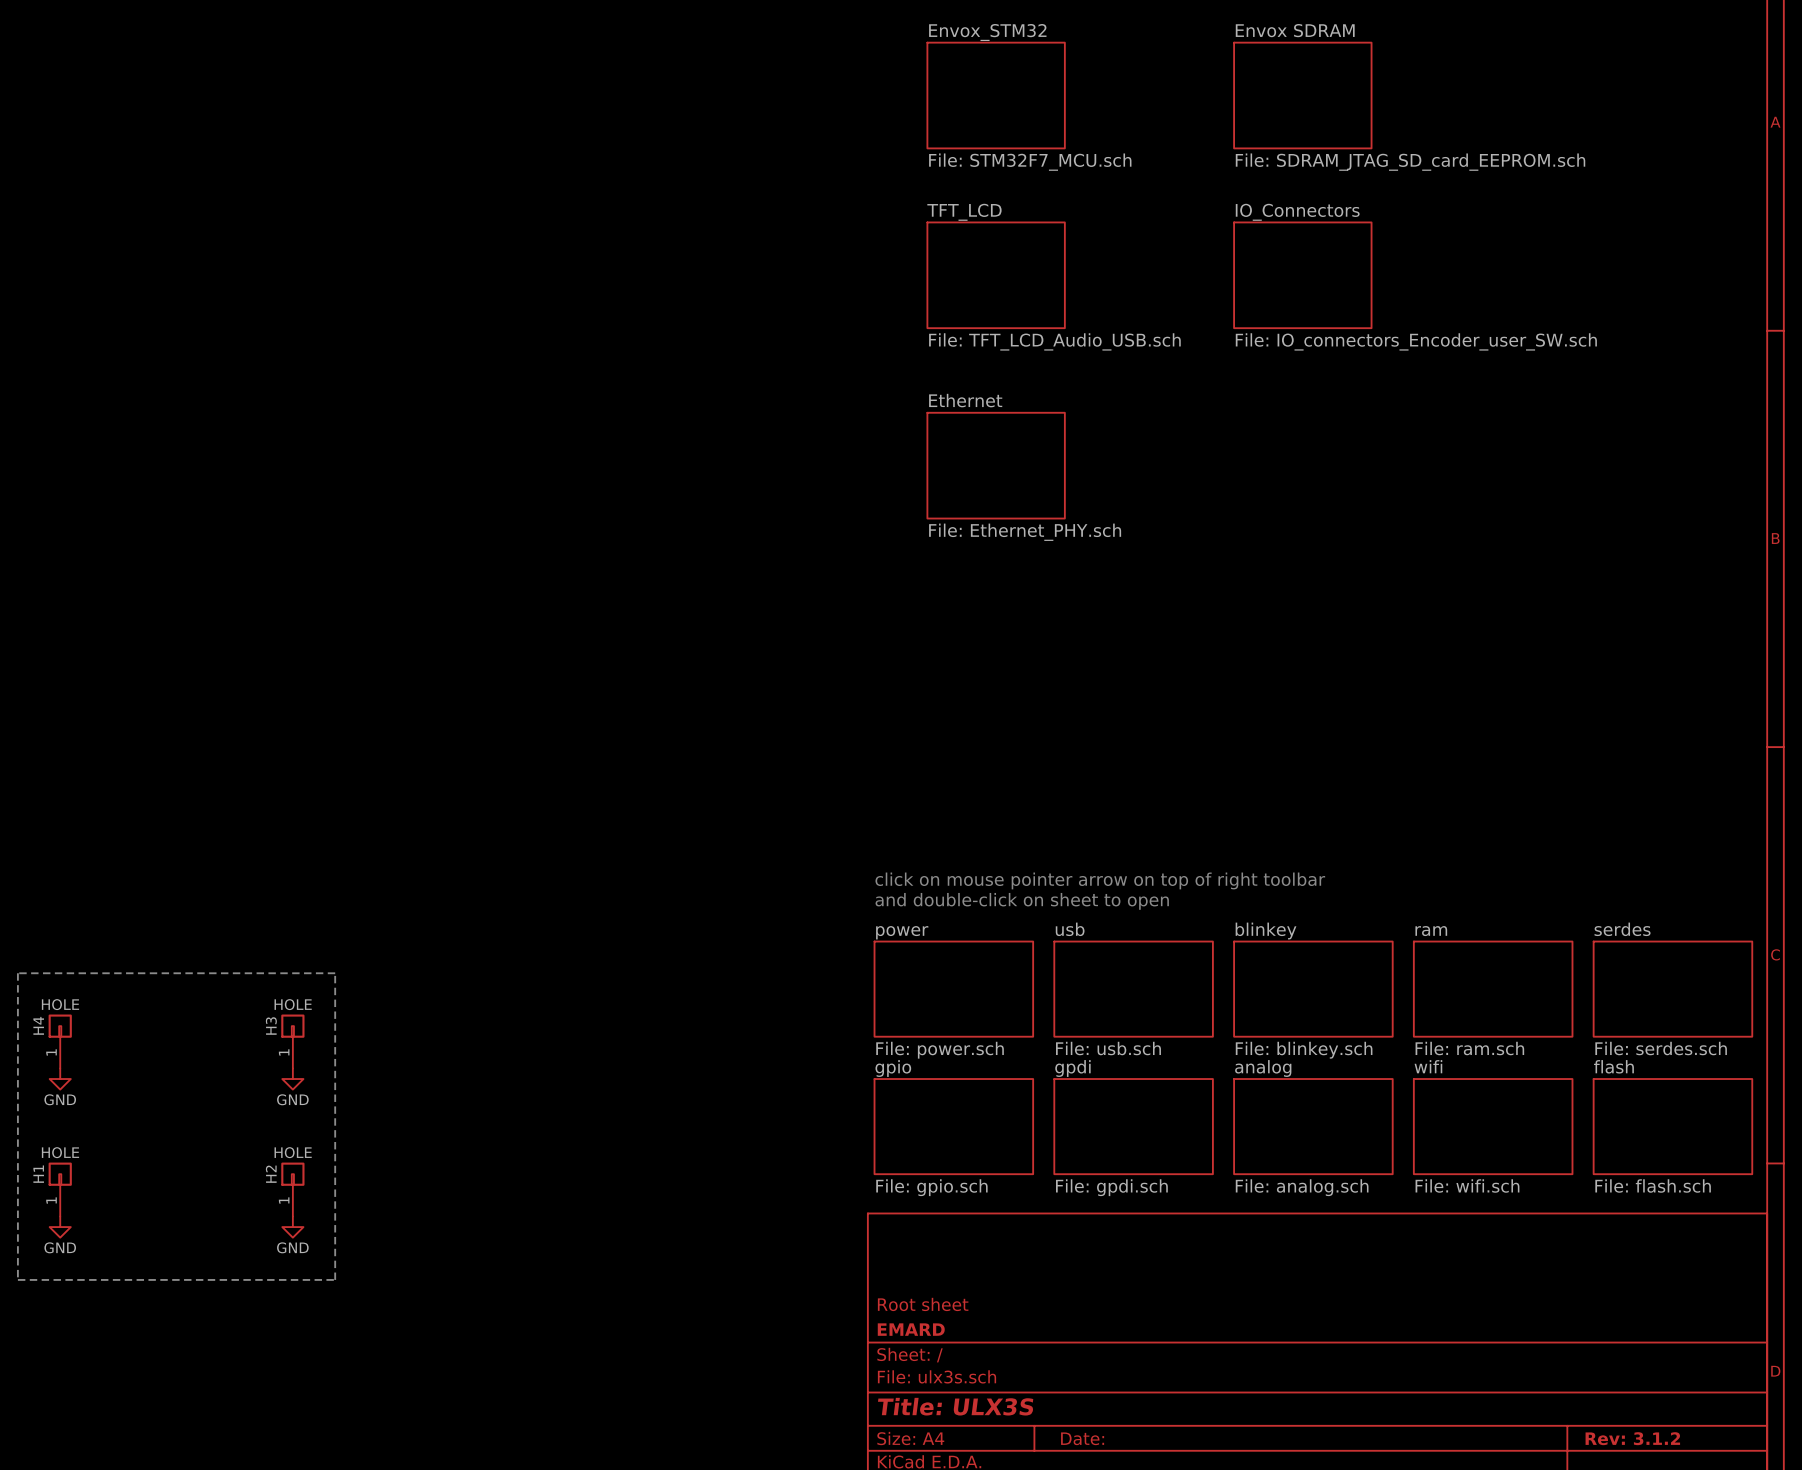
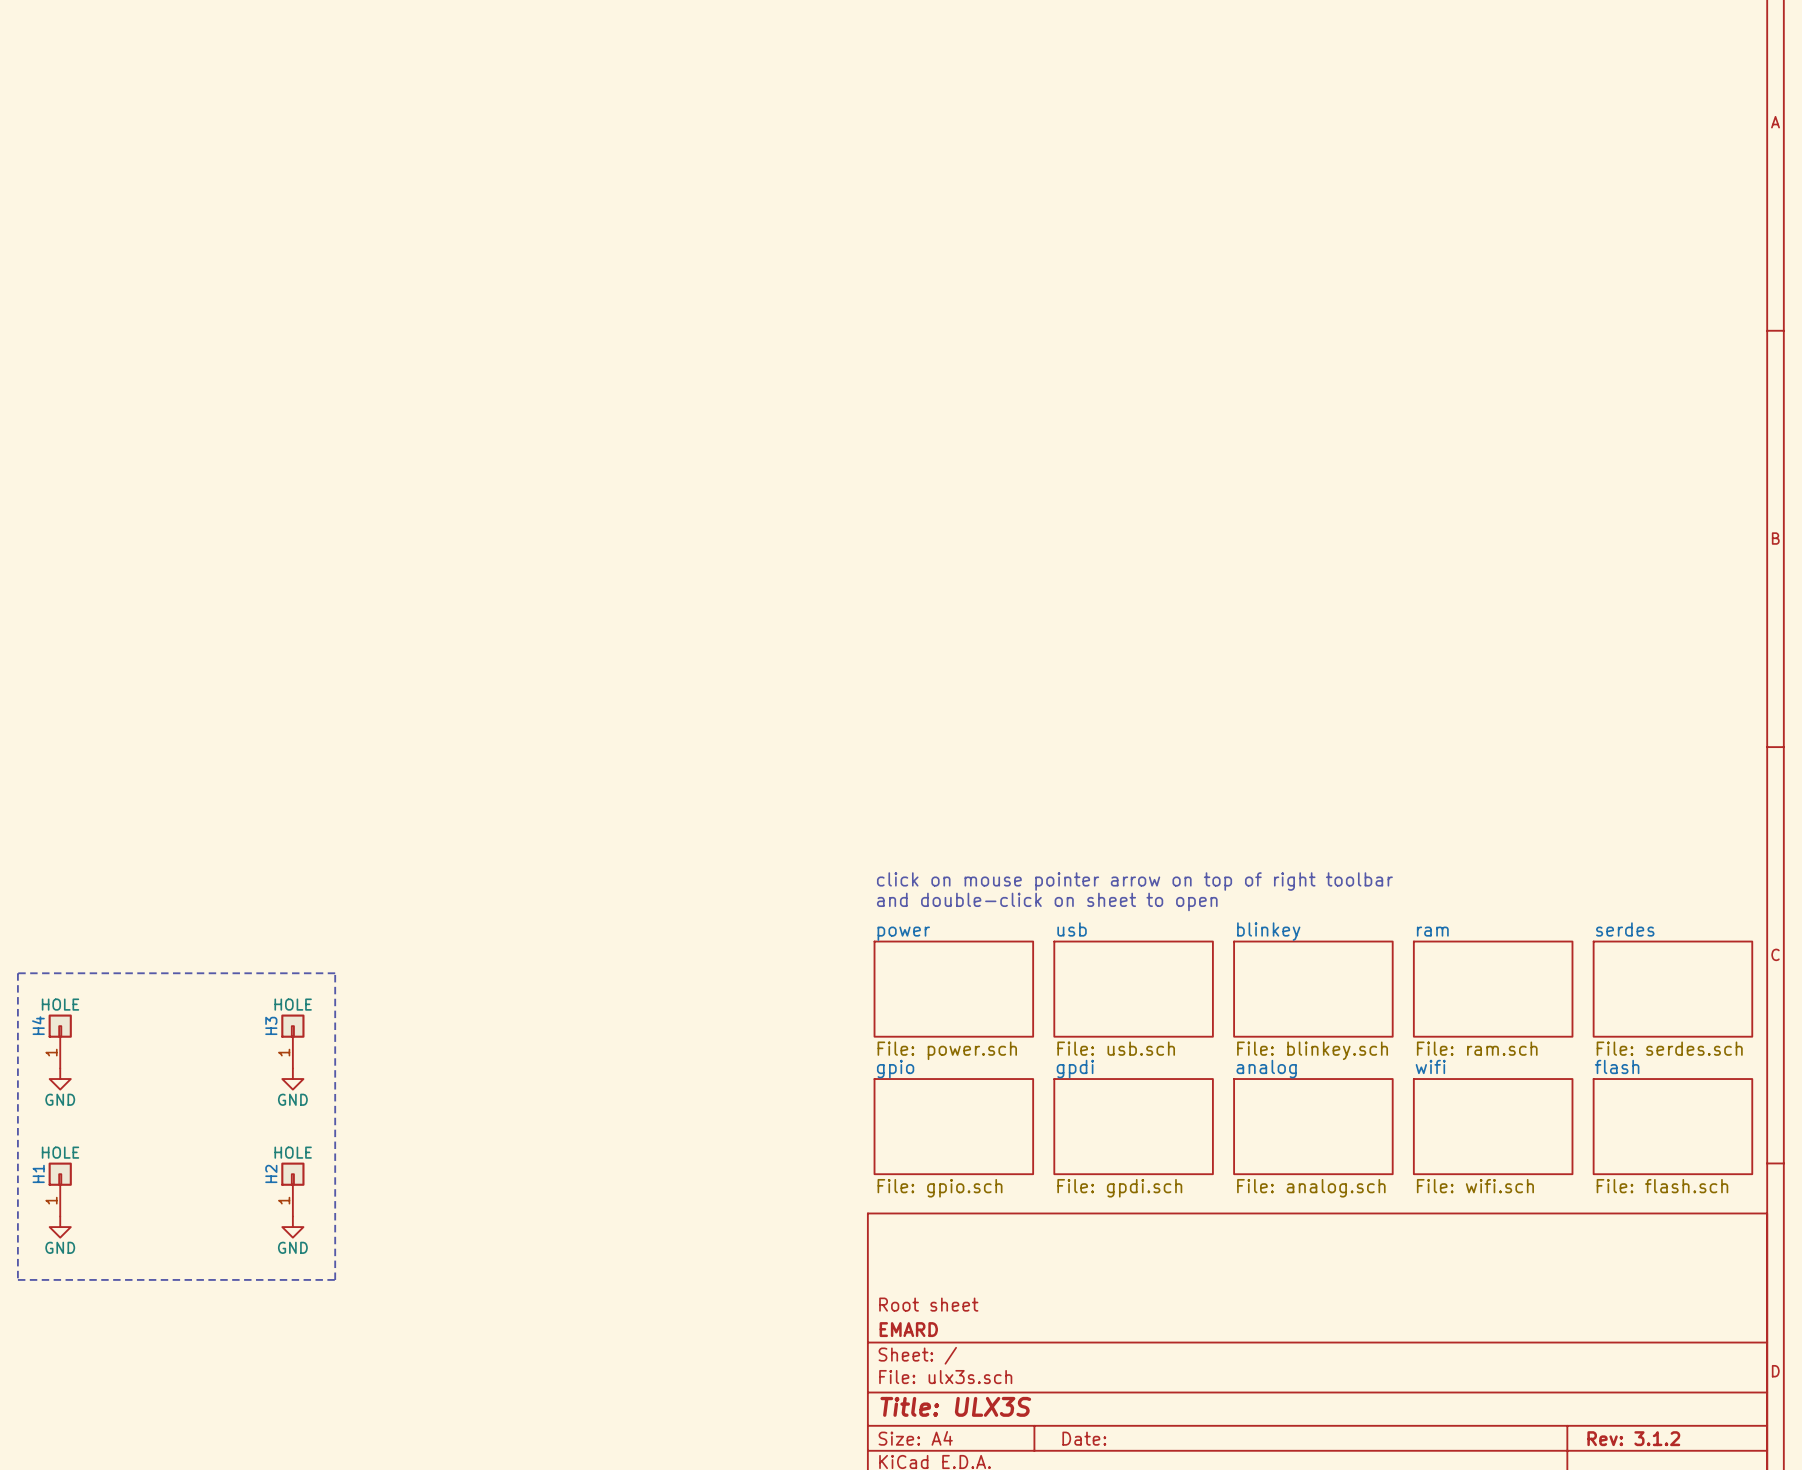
sheet Envox_STM32: File: STM32F7_MCU.sch (996, 95) -> none
sheet Envox SDRAM: File: SDRAM_JTAG_SD_card_EEPROM.sch (1302, 95) -> none
sheet TFT_LCD: File: TFT_LCD_Audio_USB.sch (996, 275) -> none
sheet IO_Connectors: File: IO_connectors_Encoder_user_SW.sch (1302, 275) -> none
sheet Ethernet: File: Ethernet_PHY.sch (996, 465) -> none

